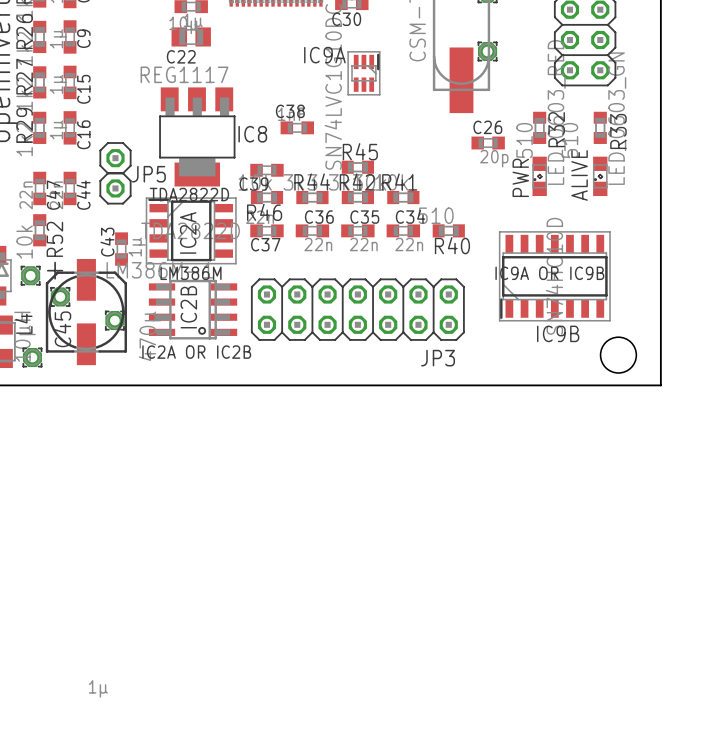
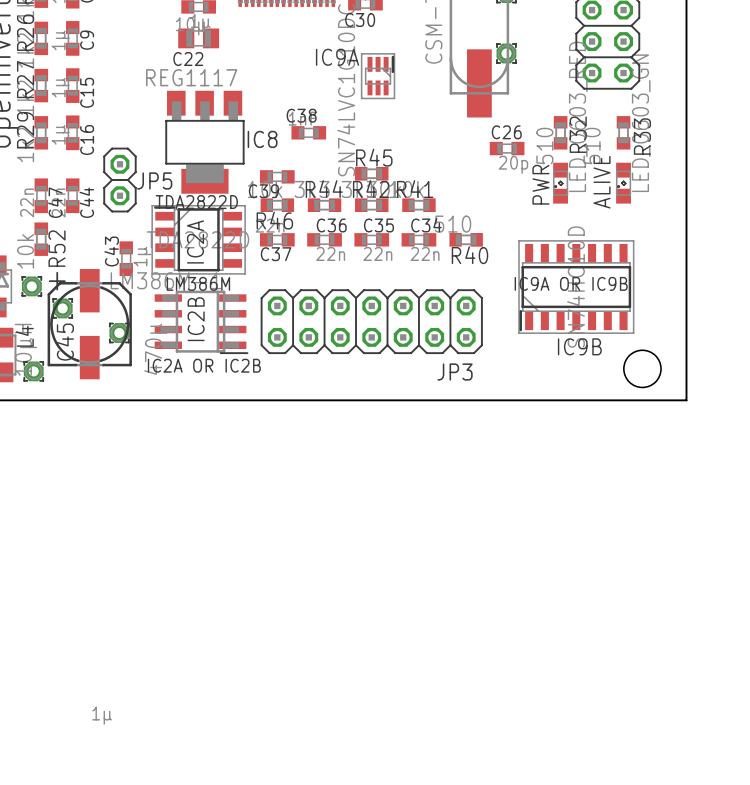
drawing: [198, 326, 207, 335] -> none
line: none -> (220, 353) (247, 353)

